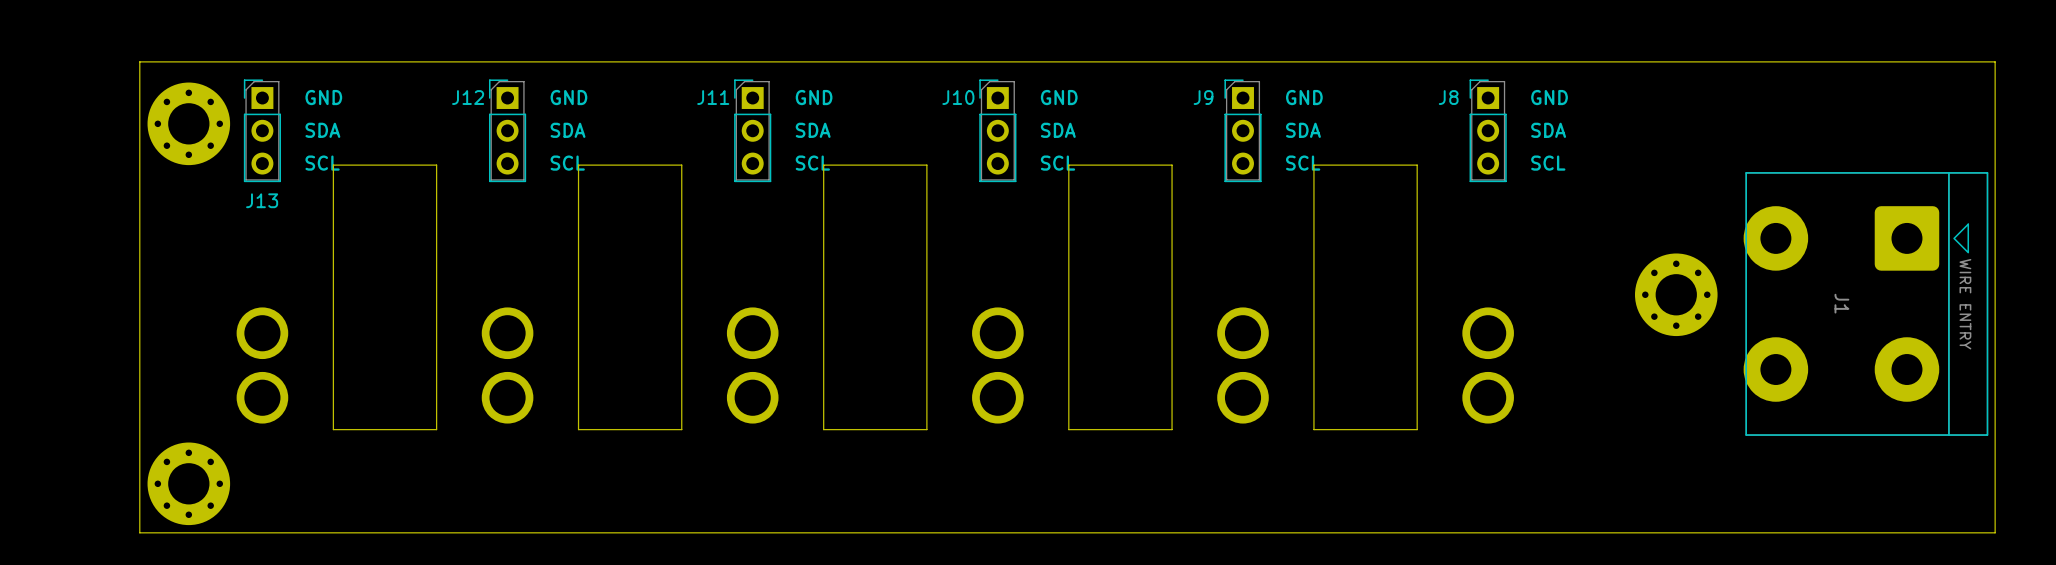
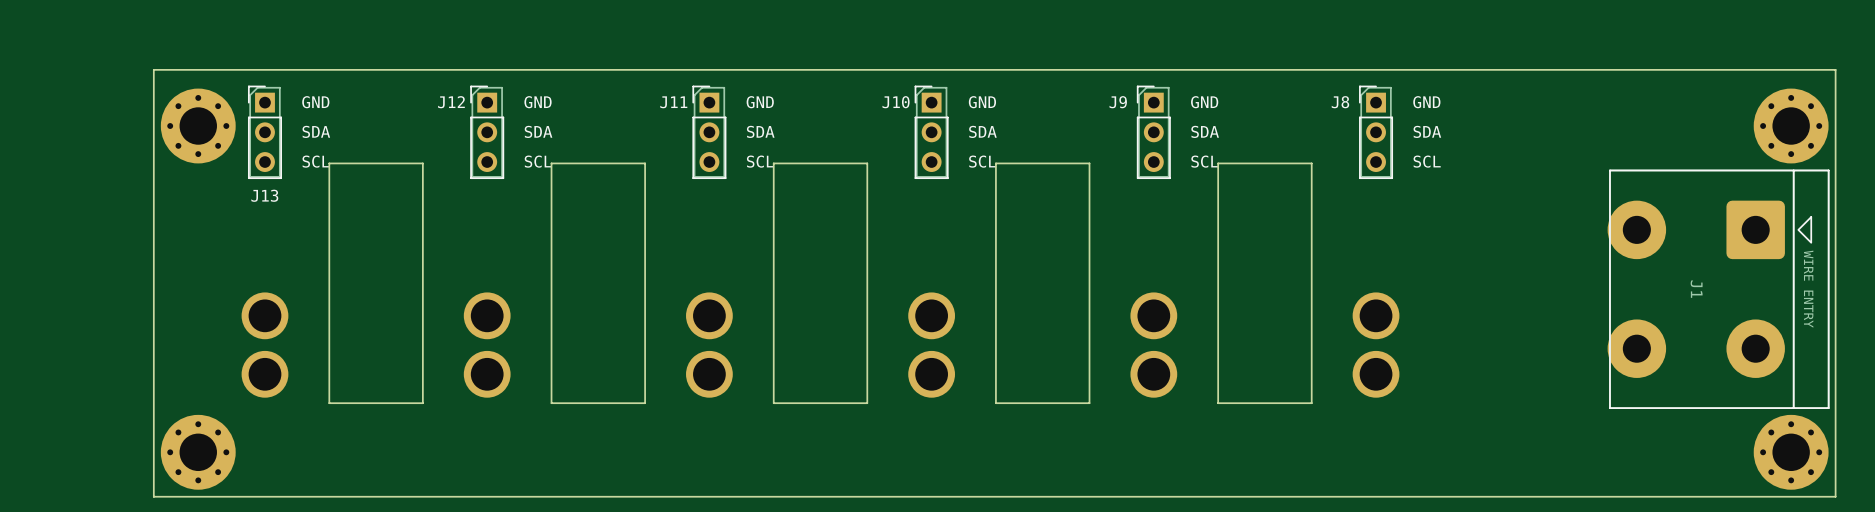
part: none -> (1791, 126)
part: (1676, 294) -> none
part: none -> (1791, 452)

